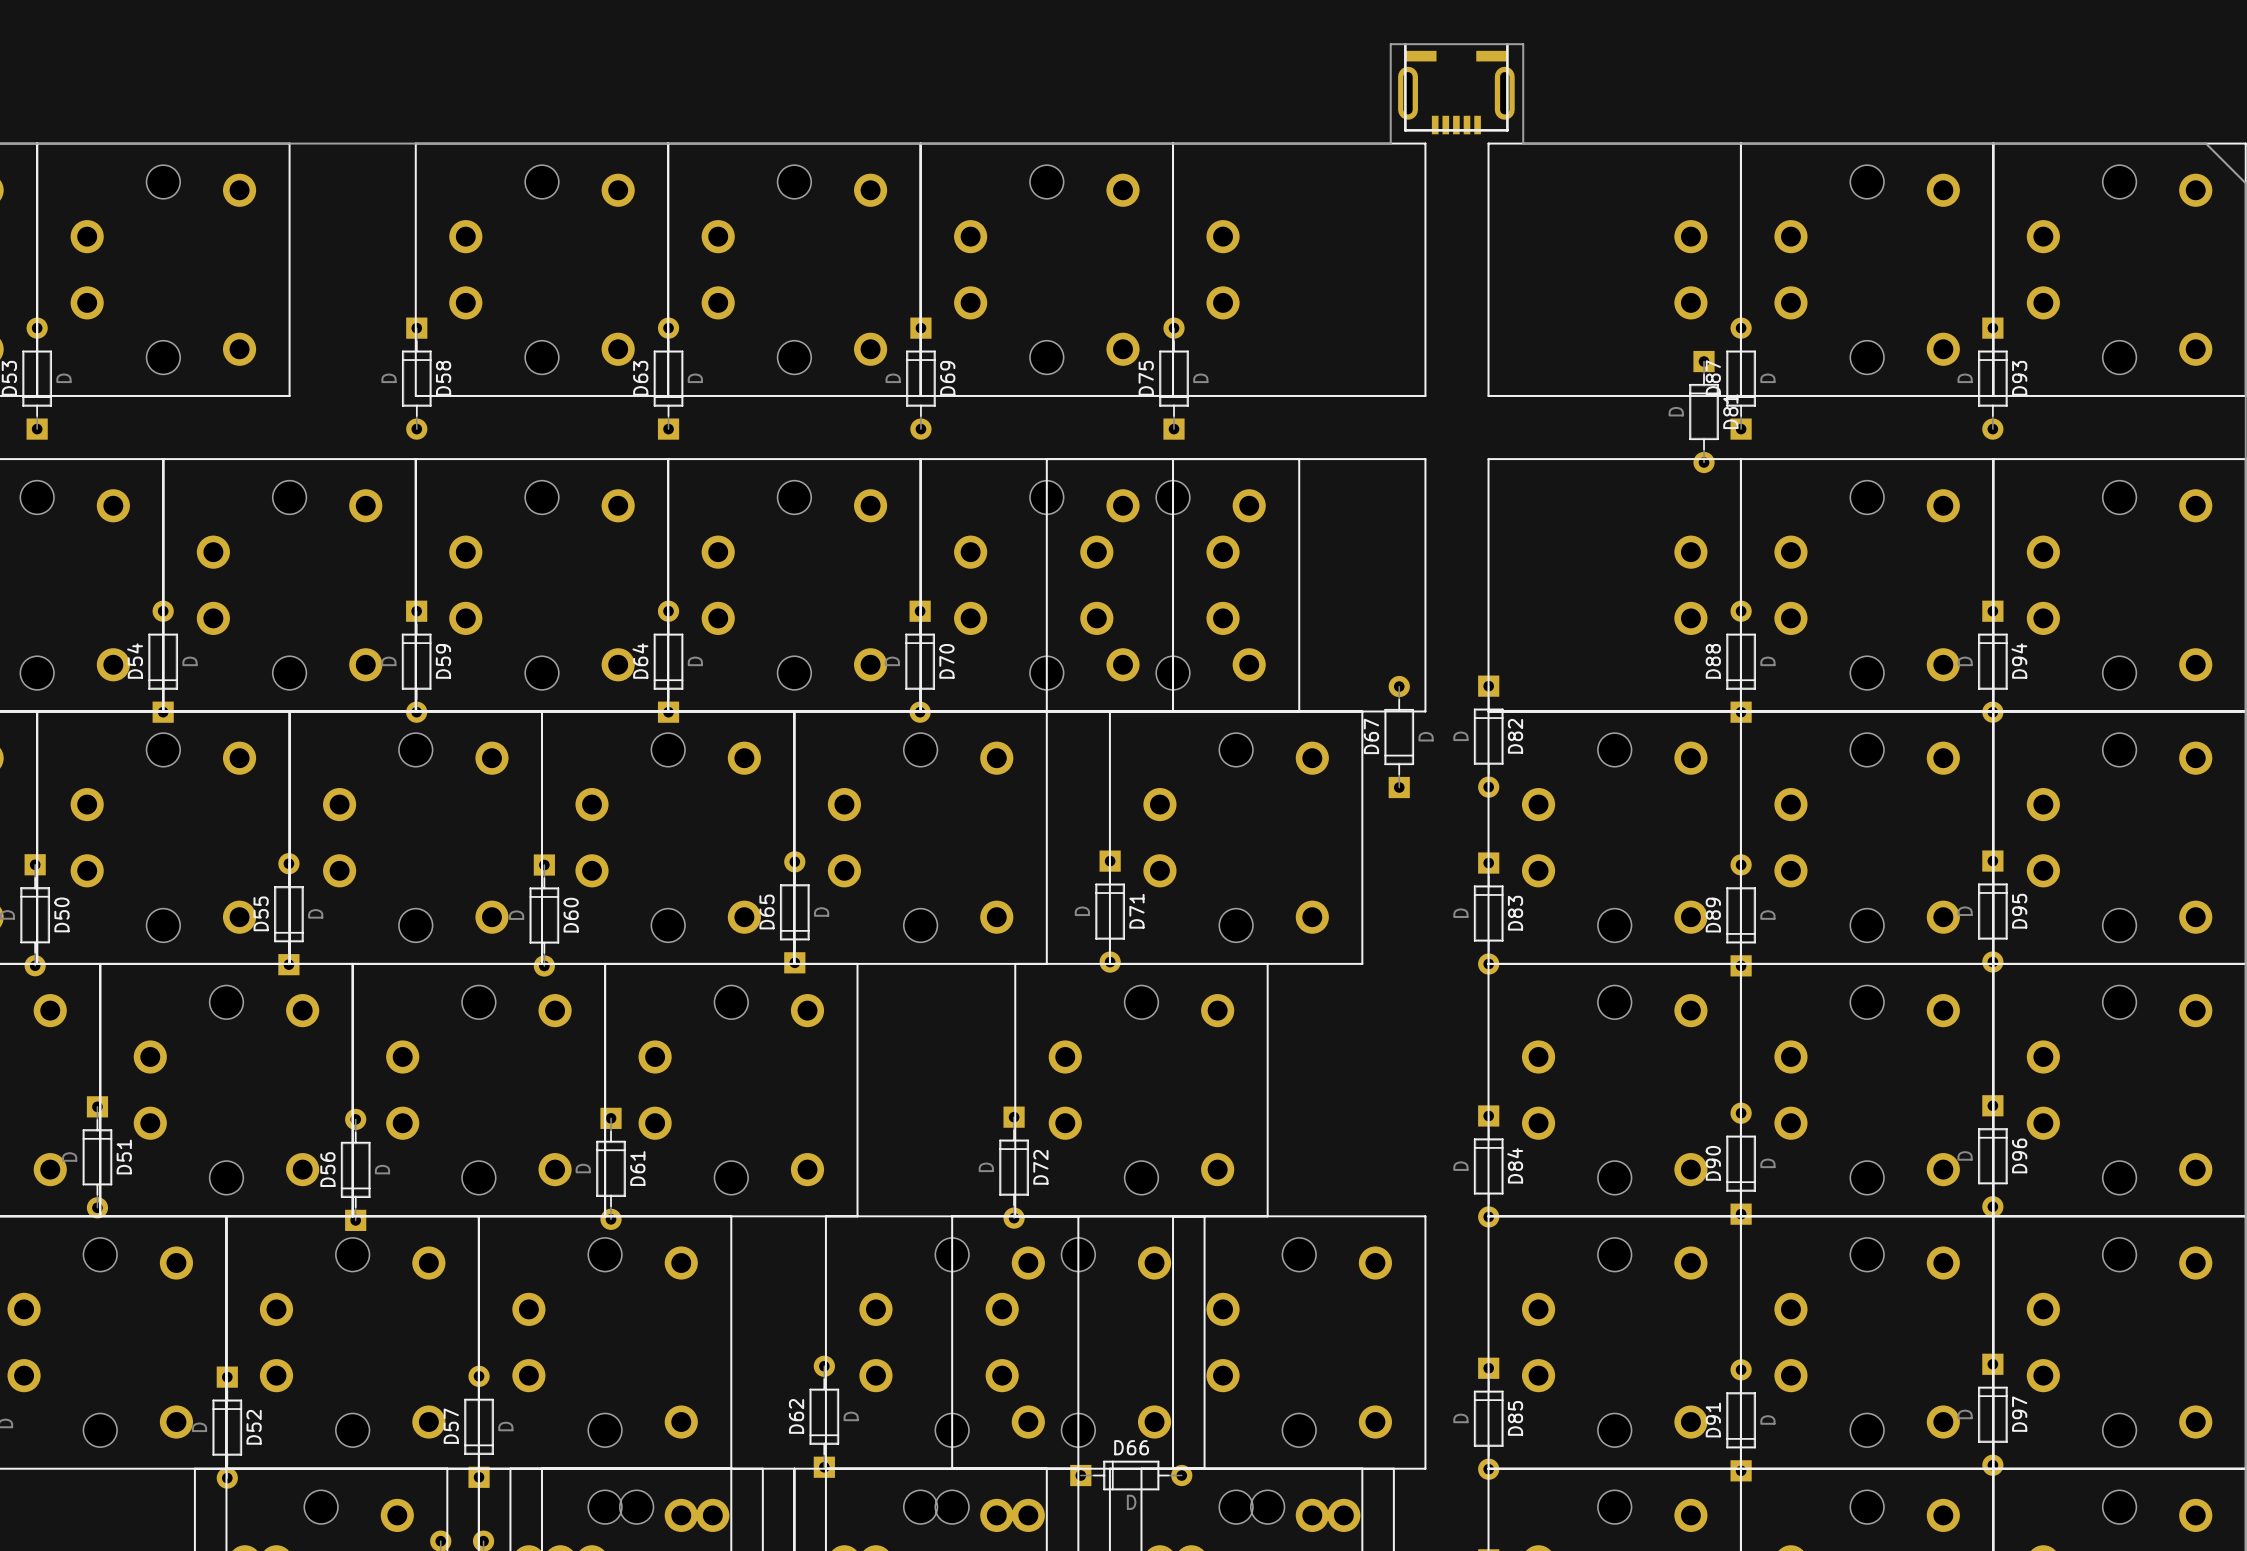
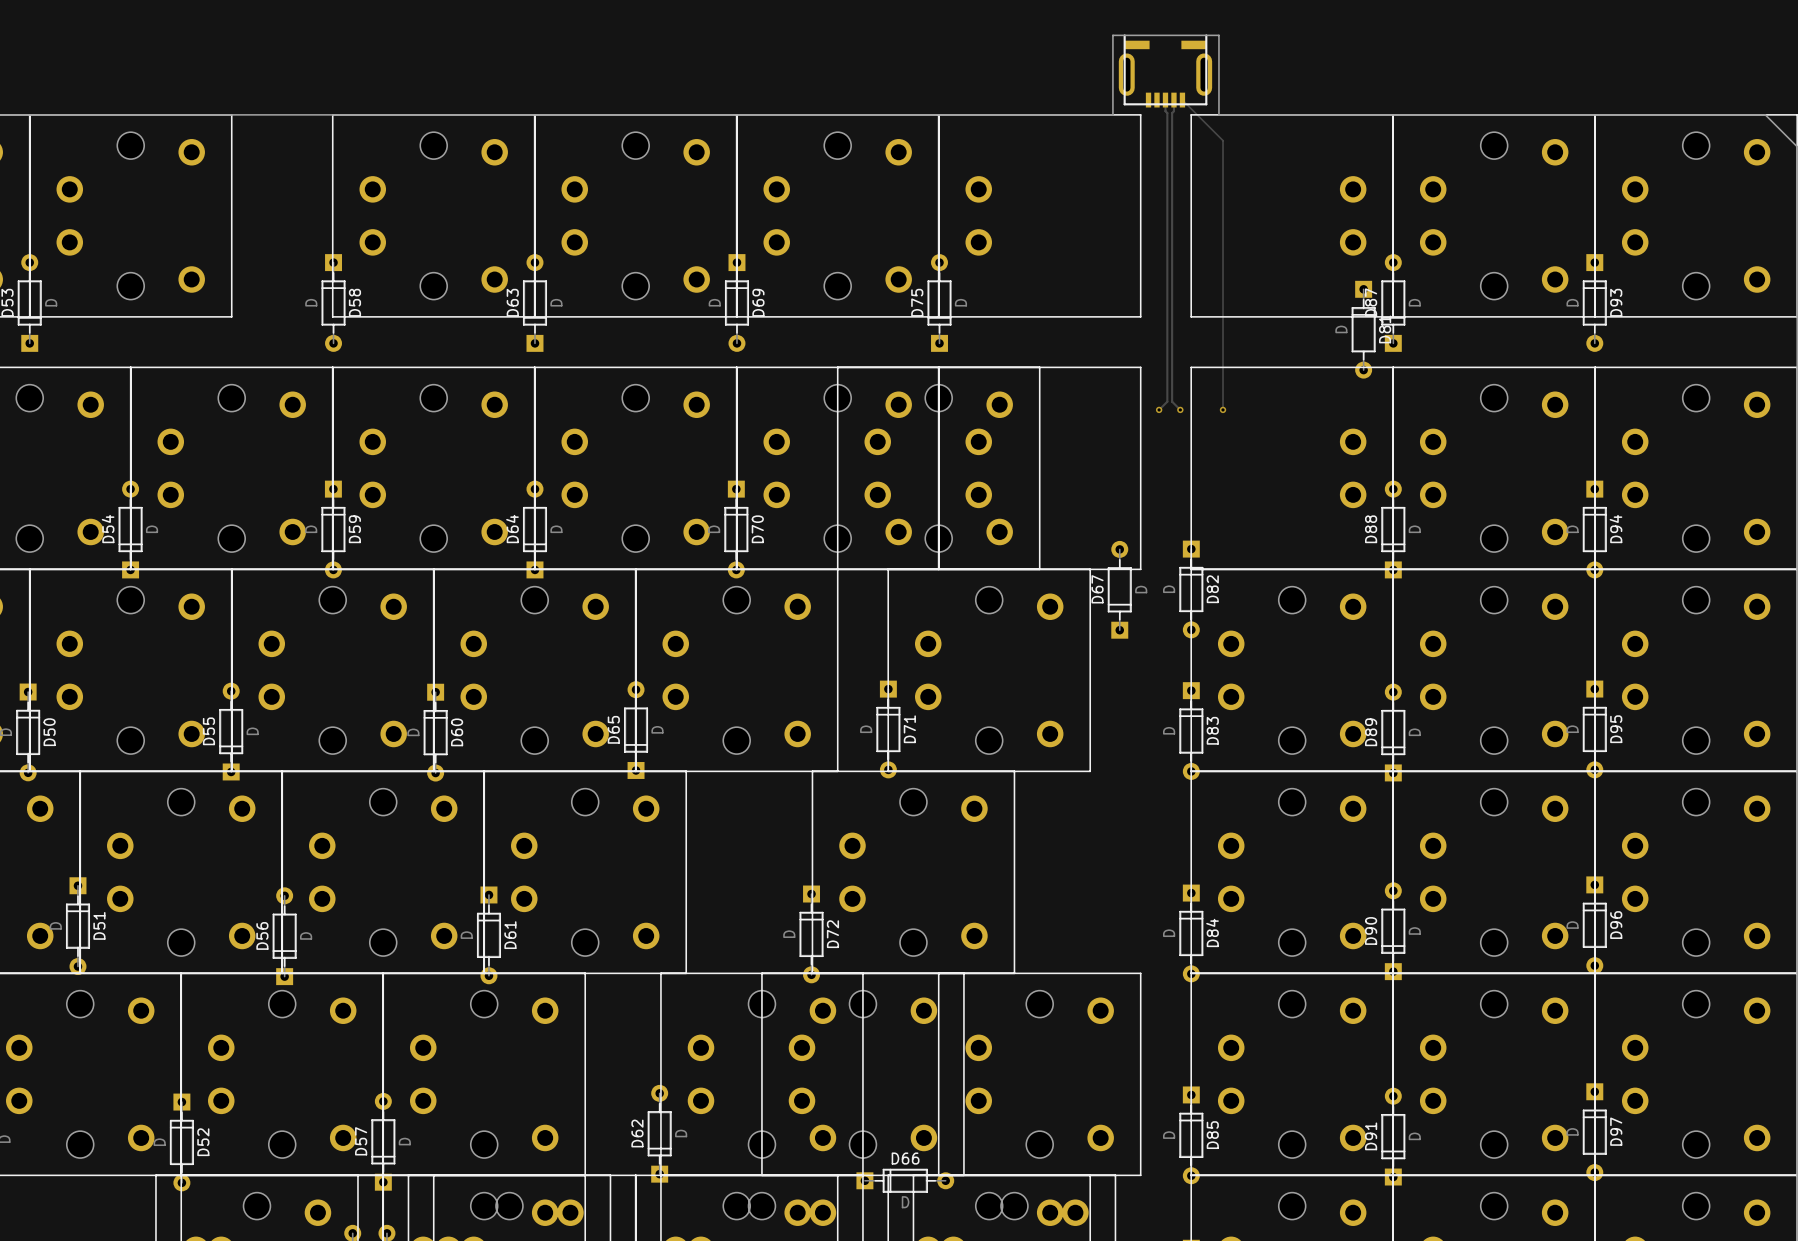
track: none -> (1165, 100) (1165, 111) (1167, 113) (1167, 401) (1159, 409)
track: none -> (1173, 100) (1173, 111) (1172, 113) (1172, 401) (1180, 409)
track: none -> (1182, 100) (1223, 140) (1223, 409)
via: none -> (1159, 409)
via: none -> (1180, 409)
via: none -> (1223, 409)

